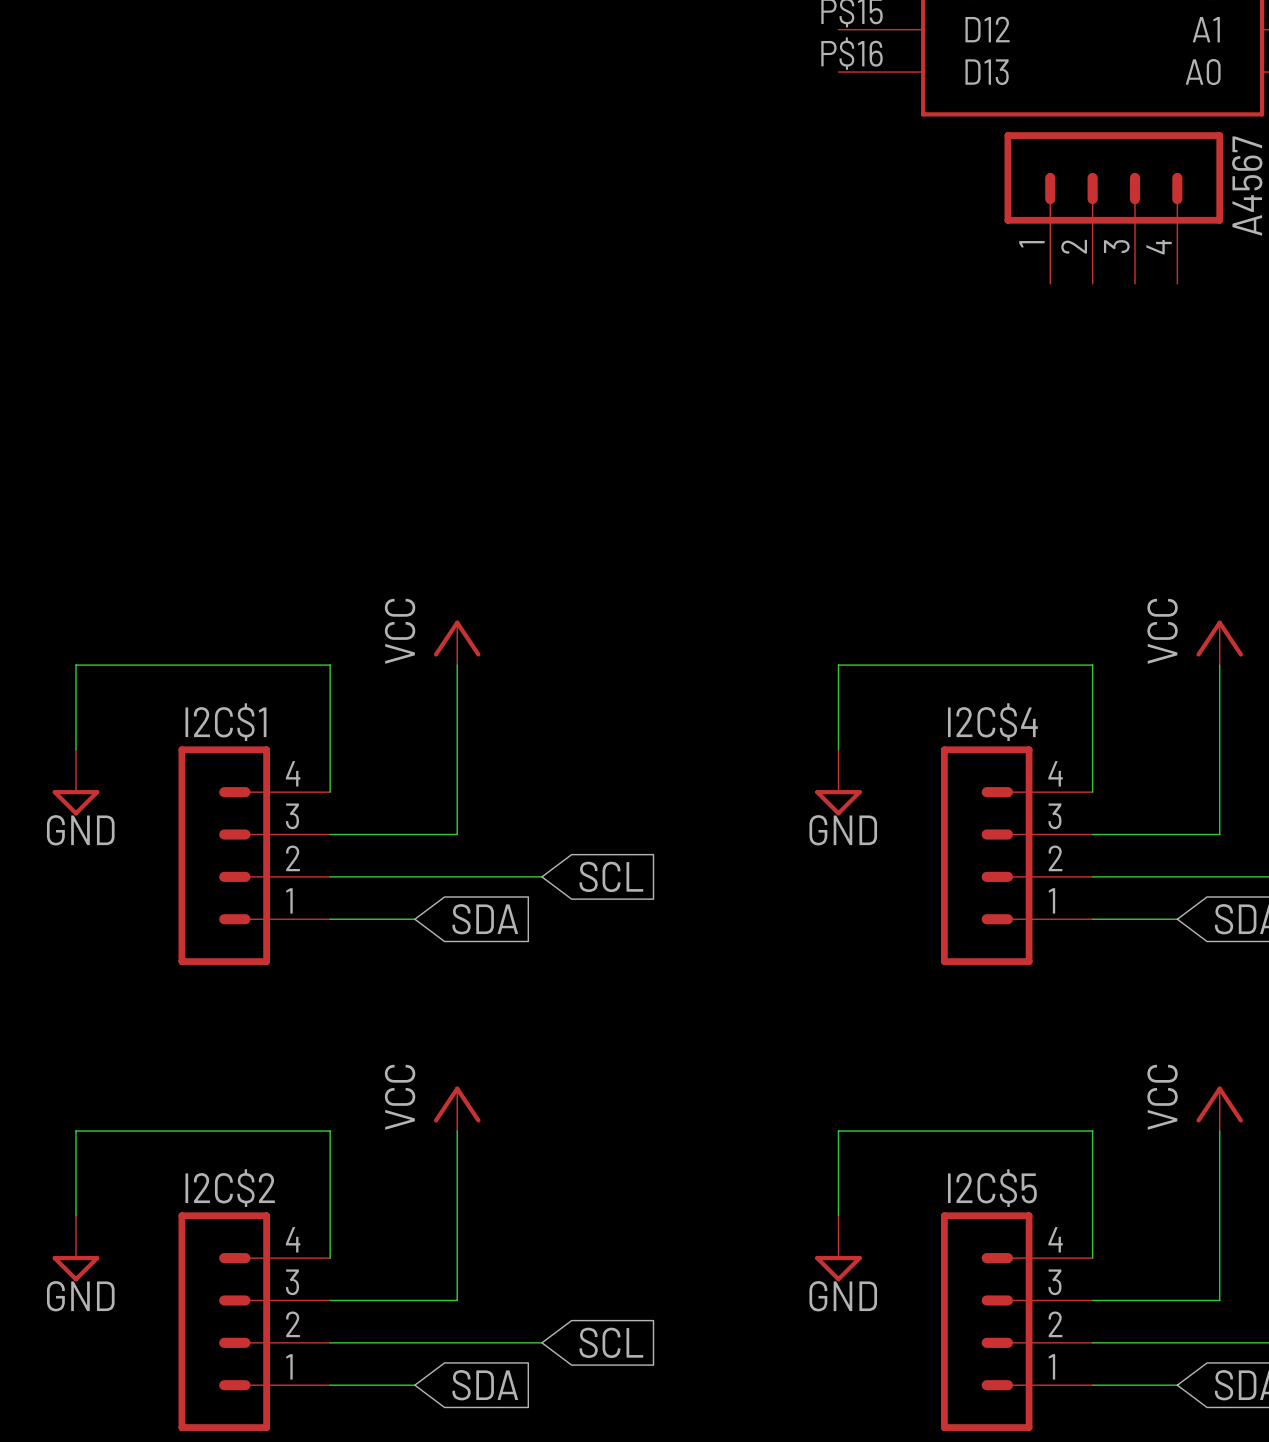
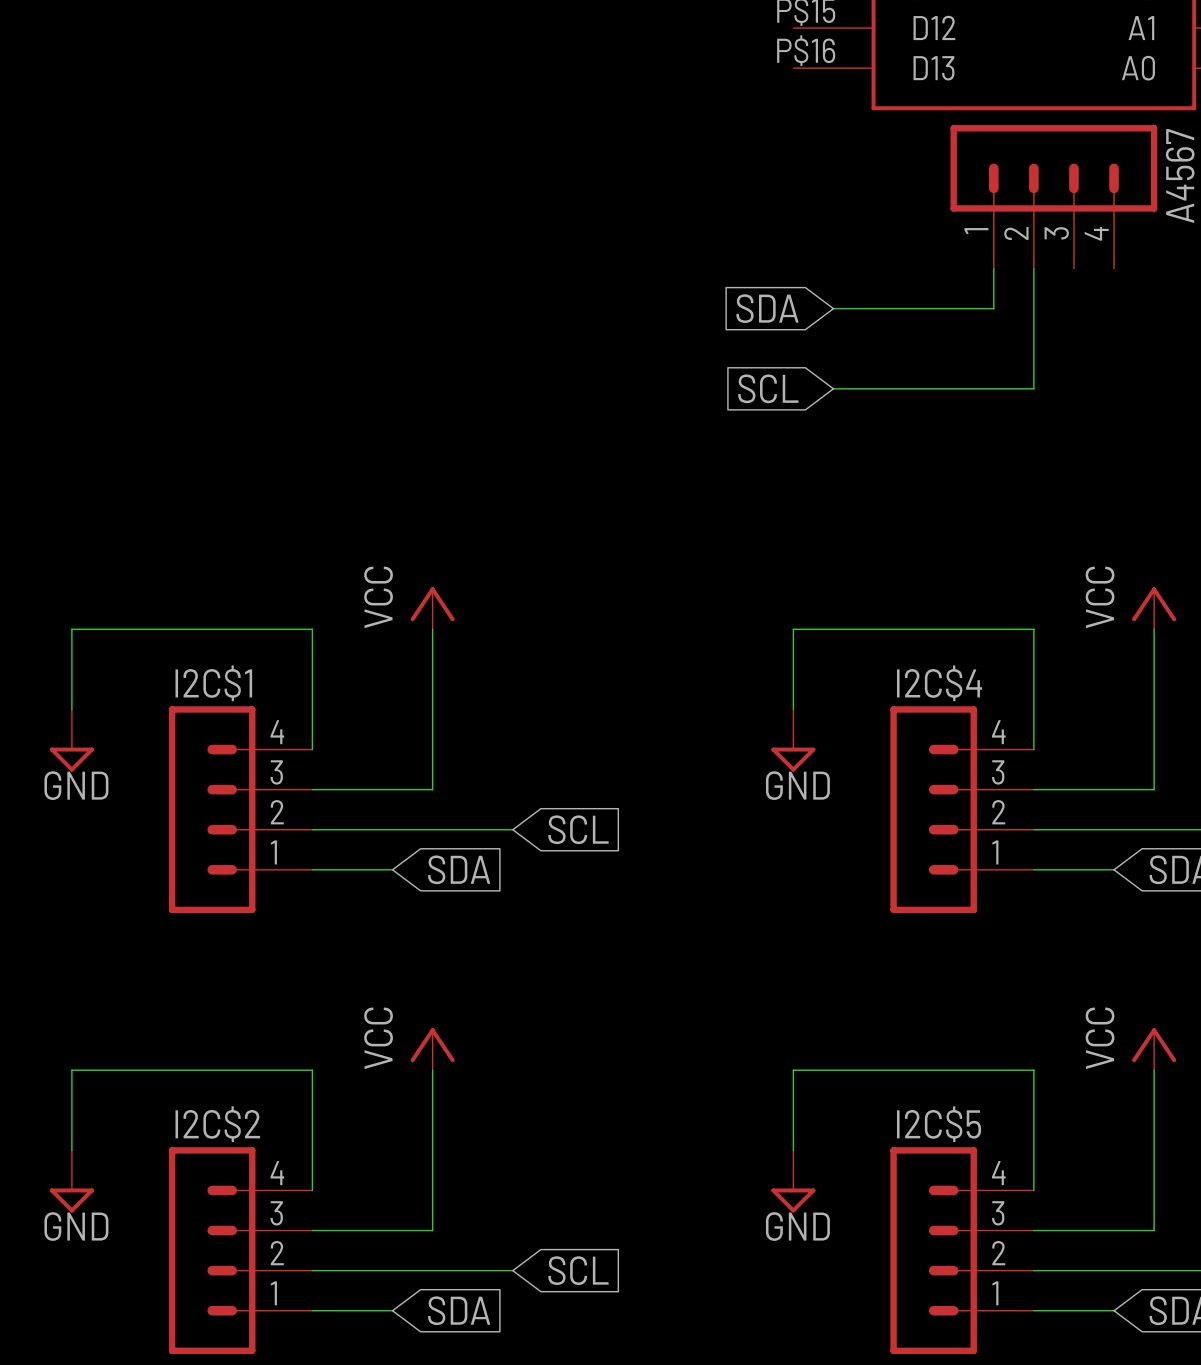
wire: none -> (993, 268) (993, 308) (833, 308)
wire: none -> (1033, 268) (1033, 388) (833, 388)
global label: none -> SDA (767, 308)
global label: none -> SCL (768, 388)

